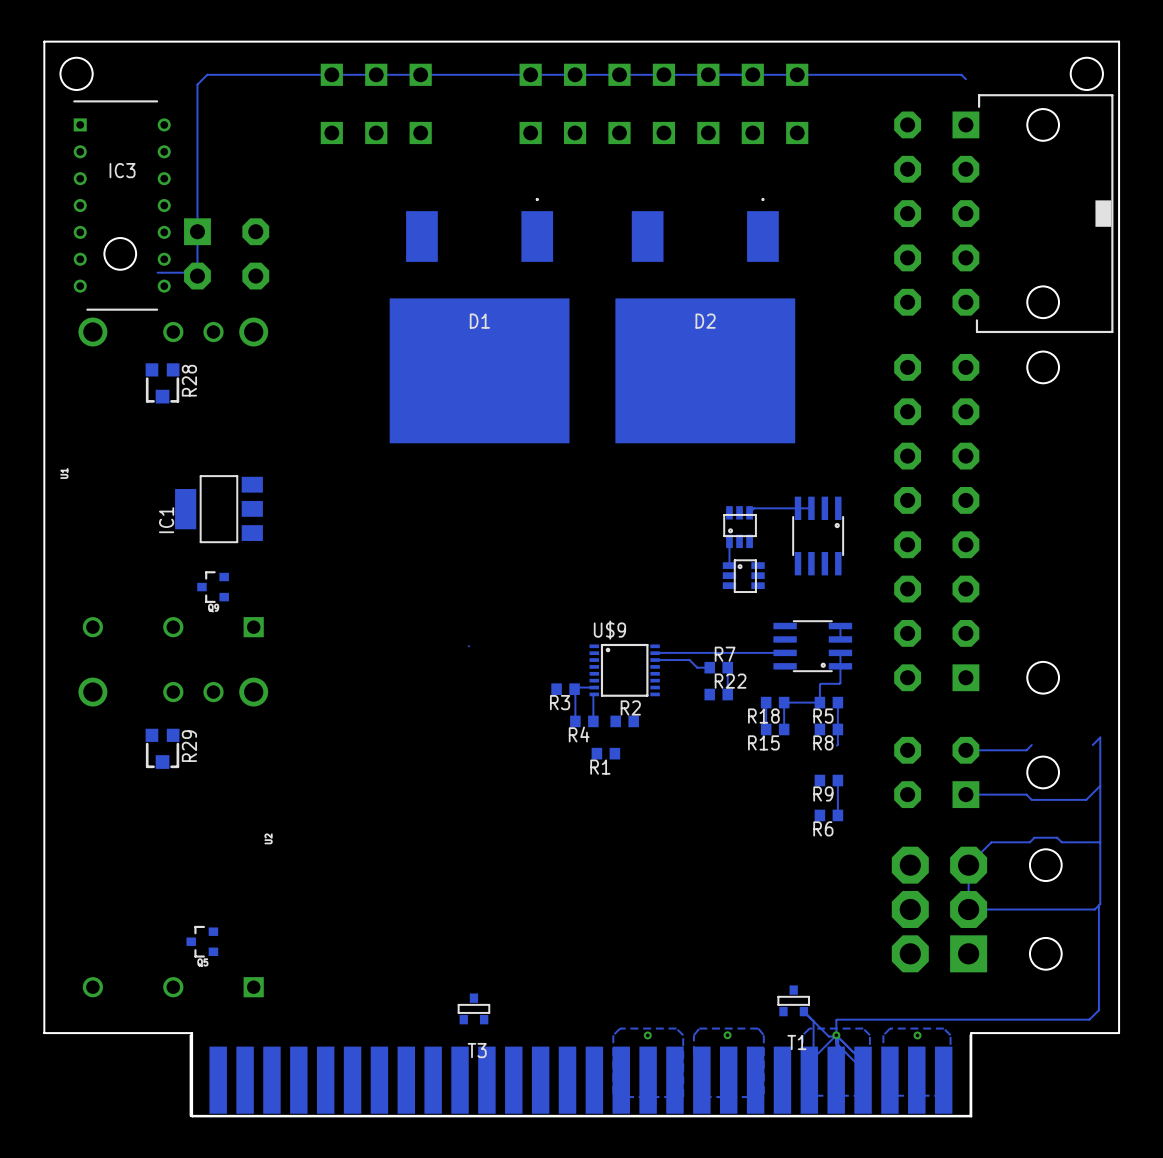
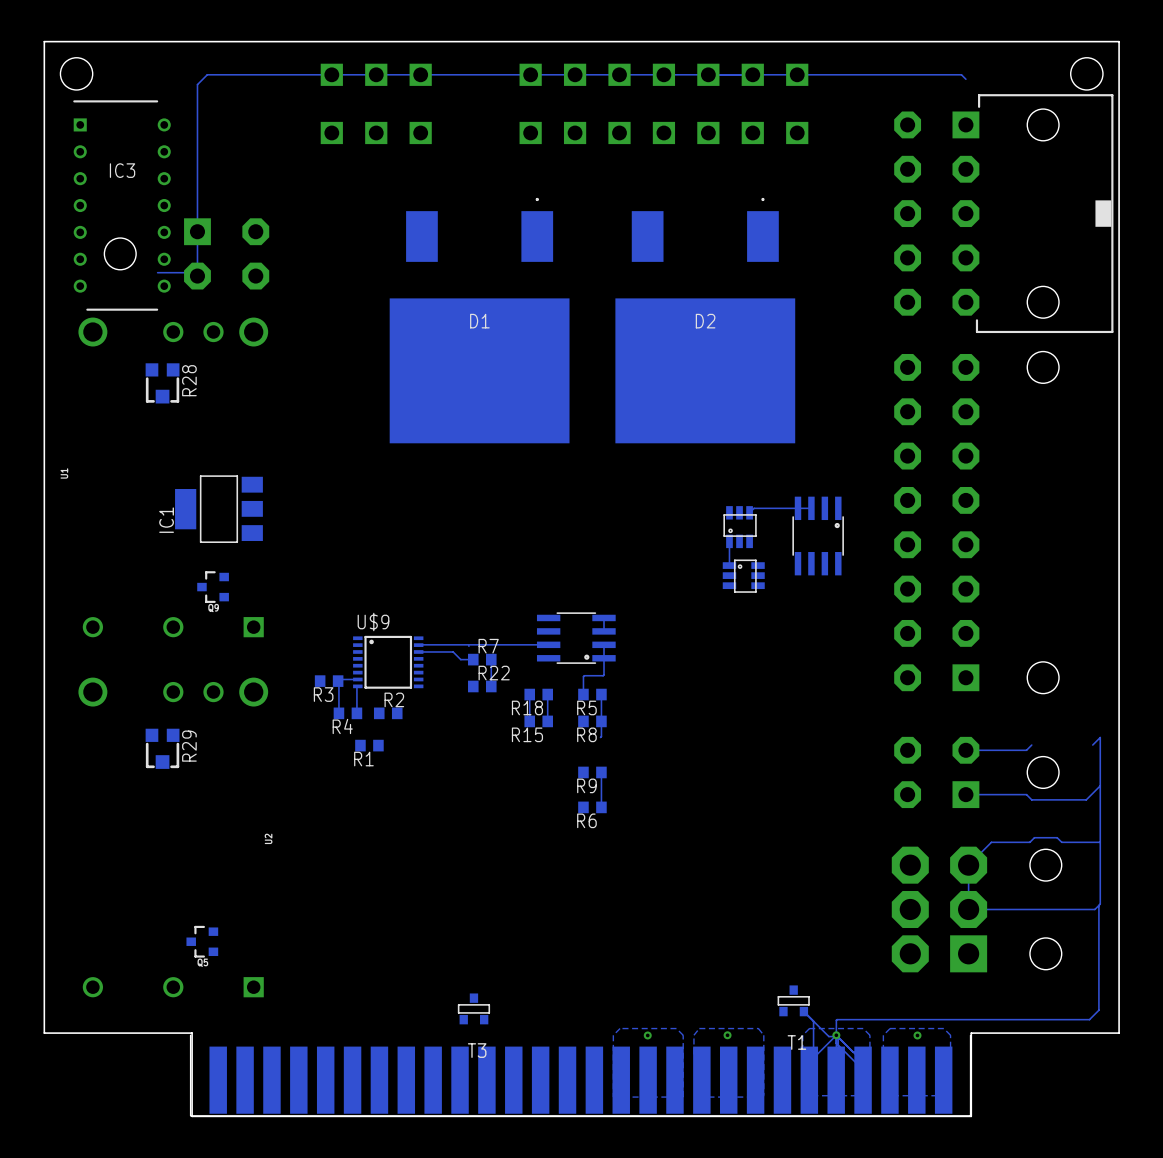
track: (840, 626) (840, 639) -> (604, 617) (604, 631)
track: none -> (604, 644) (604, 674) (584, 675) (583, 694)
part position: (812, 646) -> (576, 638)
track: (785, 652) (655, 653) -> (548, 644) (418, 645)
track: (840, 652) (840, 682) (820, 683) (819, 702) (784, 702) (784, 729) -> none
track: (655, 660) (689, 660) (697, 667) (709, 667) -> (418, 651) (453, 651) (460, 659) (473, 659)
R7 position: (718, 667) -> (482, 659)
track: (727, 667) (727, 694) -> (491, 659) (491, 686)
U$9 position: (624, 670) -> (388, 662)
track: (594, 687) (574, 689) (575, 721) -> (357, 679) (338, 681) (338, 713)
R3 position: (565, 689) -> (329, 681)
track: none -> (547, 694) (547, 721)
R22 position: (718, 694) -> (482, 686)
track: (593, 695) (593, 721) -> (356, 687) (356, 713)
track: (766, 702) (766, 729) -> (529, 694) (529, 721)
R18 position: (775, 702) -> (538, 694)
R5 position: (828, 702) -> (592, 694)
track: (837, 702) (836, 745) -> (601, 694) (600, 737)
R4 position: (584, 721) -> (347, 713)
R2 position: (624, 721) -> (388, 713)
R15 position: (775, 729) -> (538, 721)
R8 position: (828, 729) -> (592, 721)
R1 position: (605, 753) -> (369, 745)
R9 position: (828, 780) -> (592, 772)
track: (837, 780) (837, 815) -> (601, 772) (601, 807)
R6 position: (828, 815) -> (592, 807)

